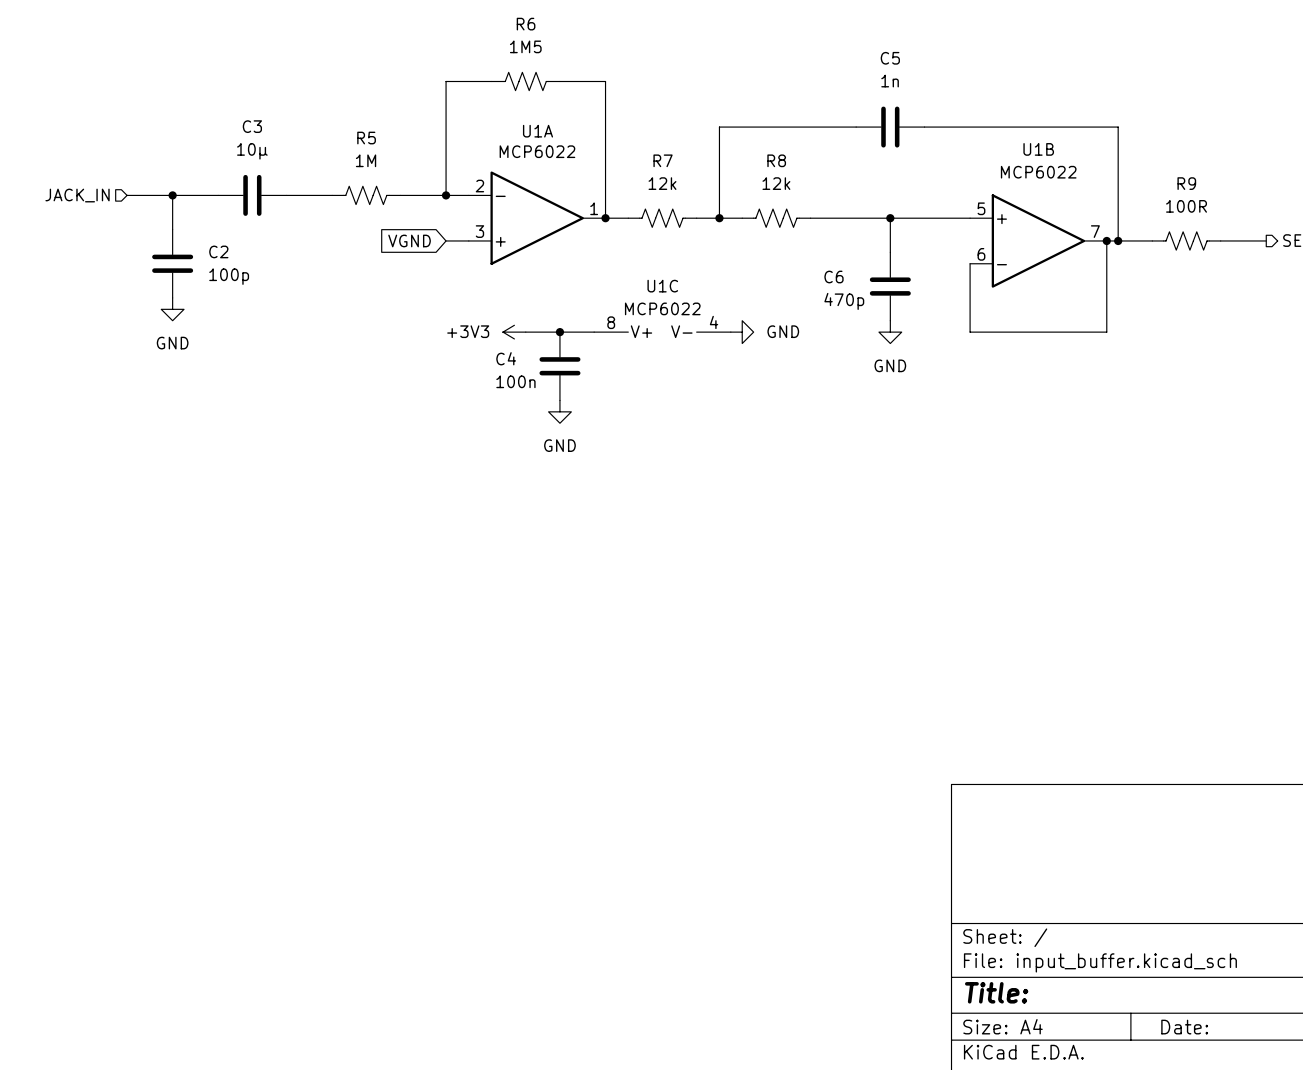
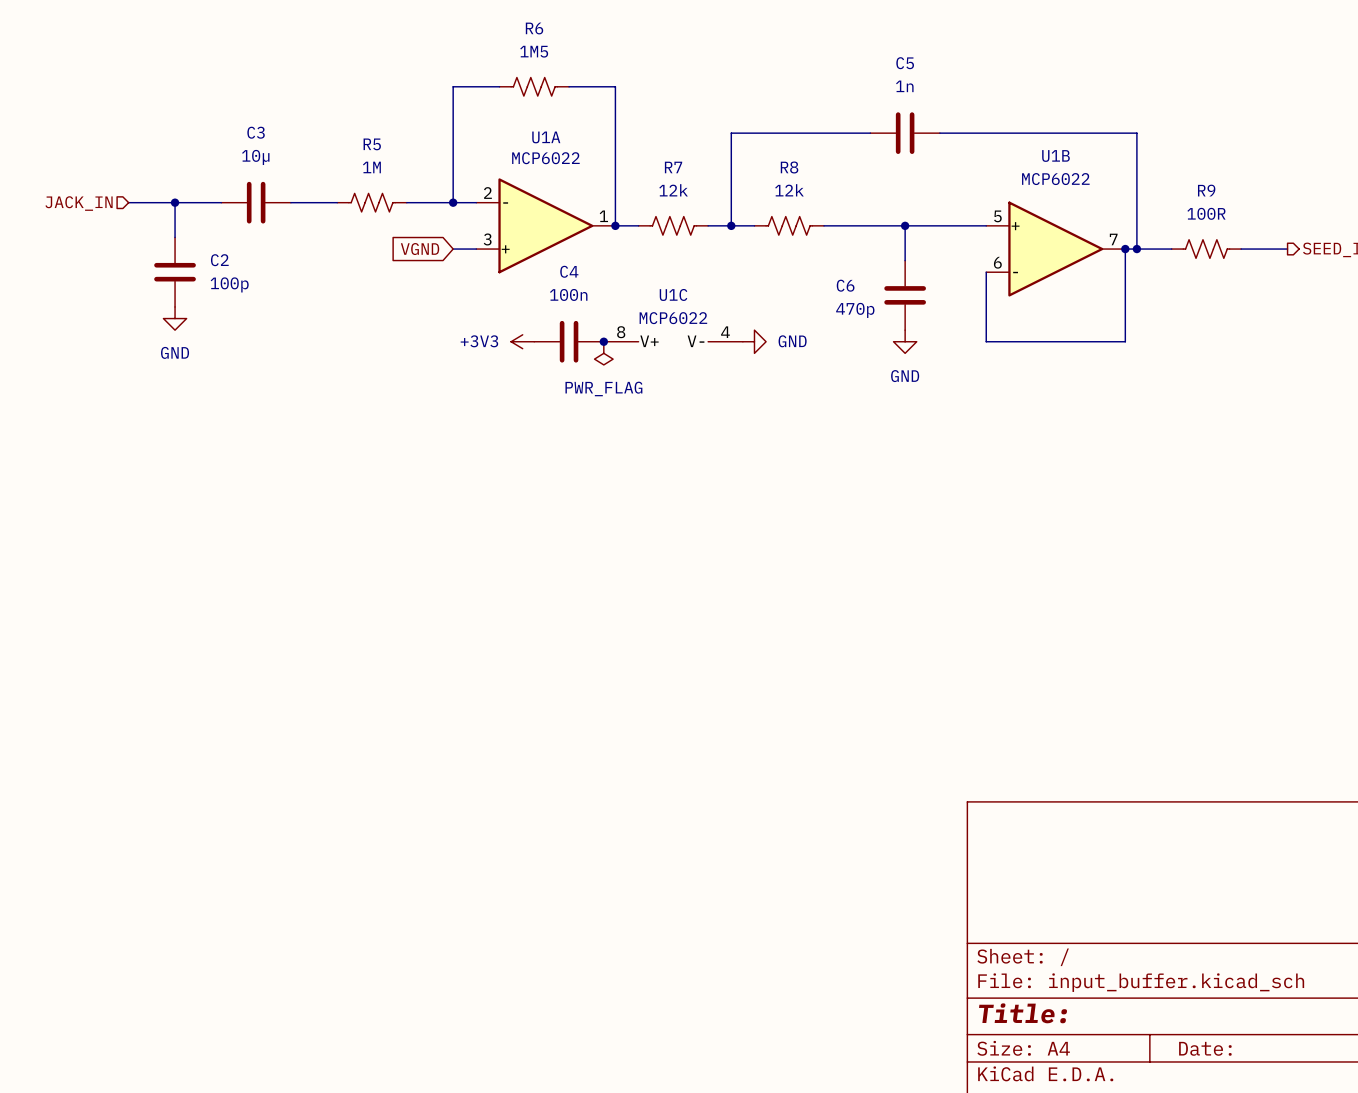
junction position: (559, 332) -> (603, 341)
power symbol: none -> PWR_FLAG (603, 353)
C4 rotation: 0° (559, 366) -> 90° clockwise (569, 341)
power symbol: GND (559, 411) -> none

